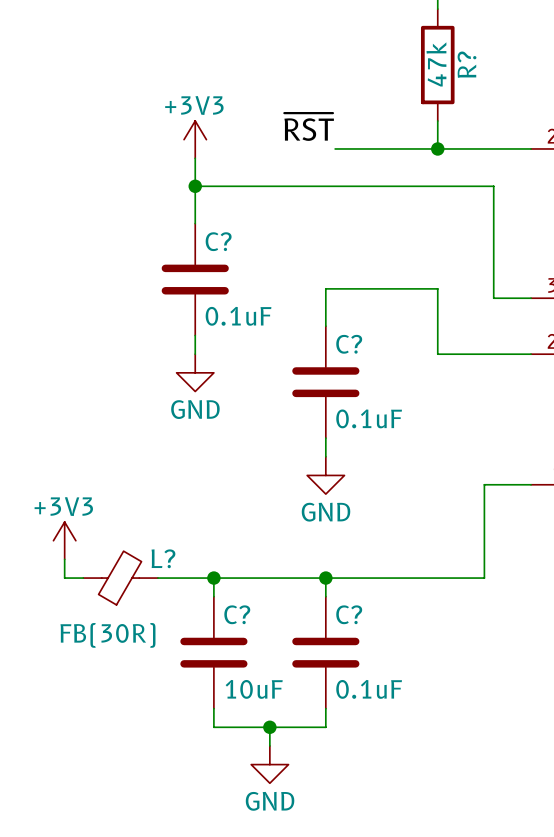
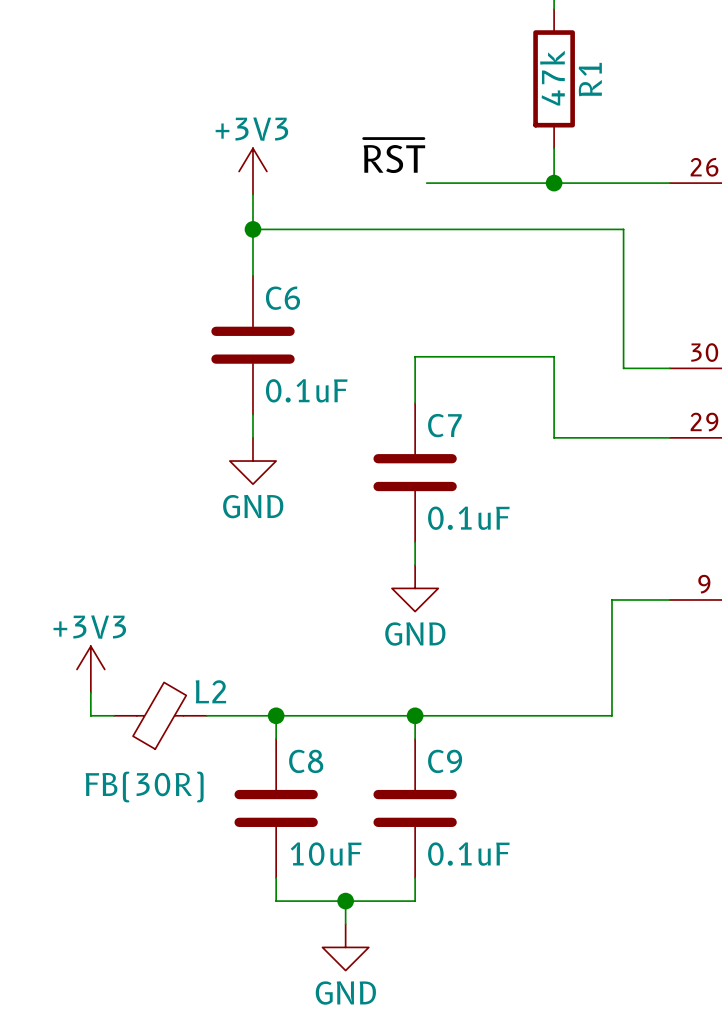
R? name: R? (467, 64) -> R1 (590, 79)
C? name: C? (218, 241) -> C6 (282, 298)
C? name: C? (349, 344) -> C7 (444, 425)
L? name: L? (163, 558) -> L2 (210, 691)
C? name: C? (237, 614) -> C8 (306, 761)
C? name: C? (349, 614) -> C9 (445, 761)

